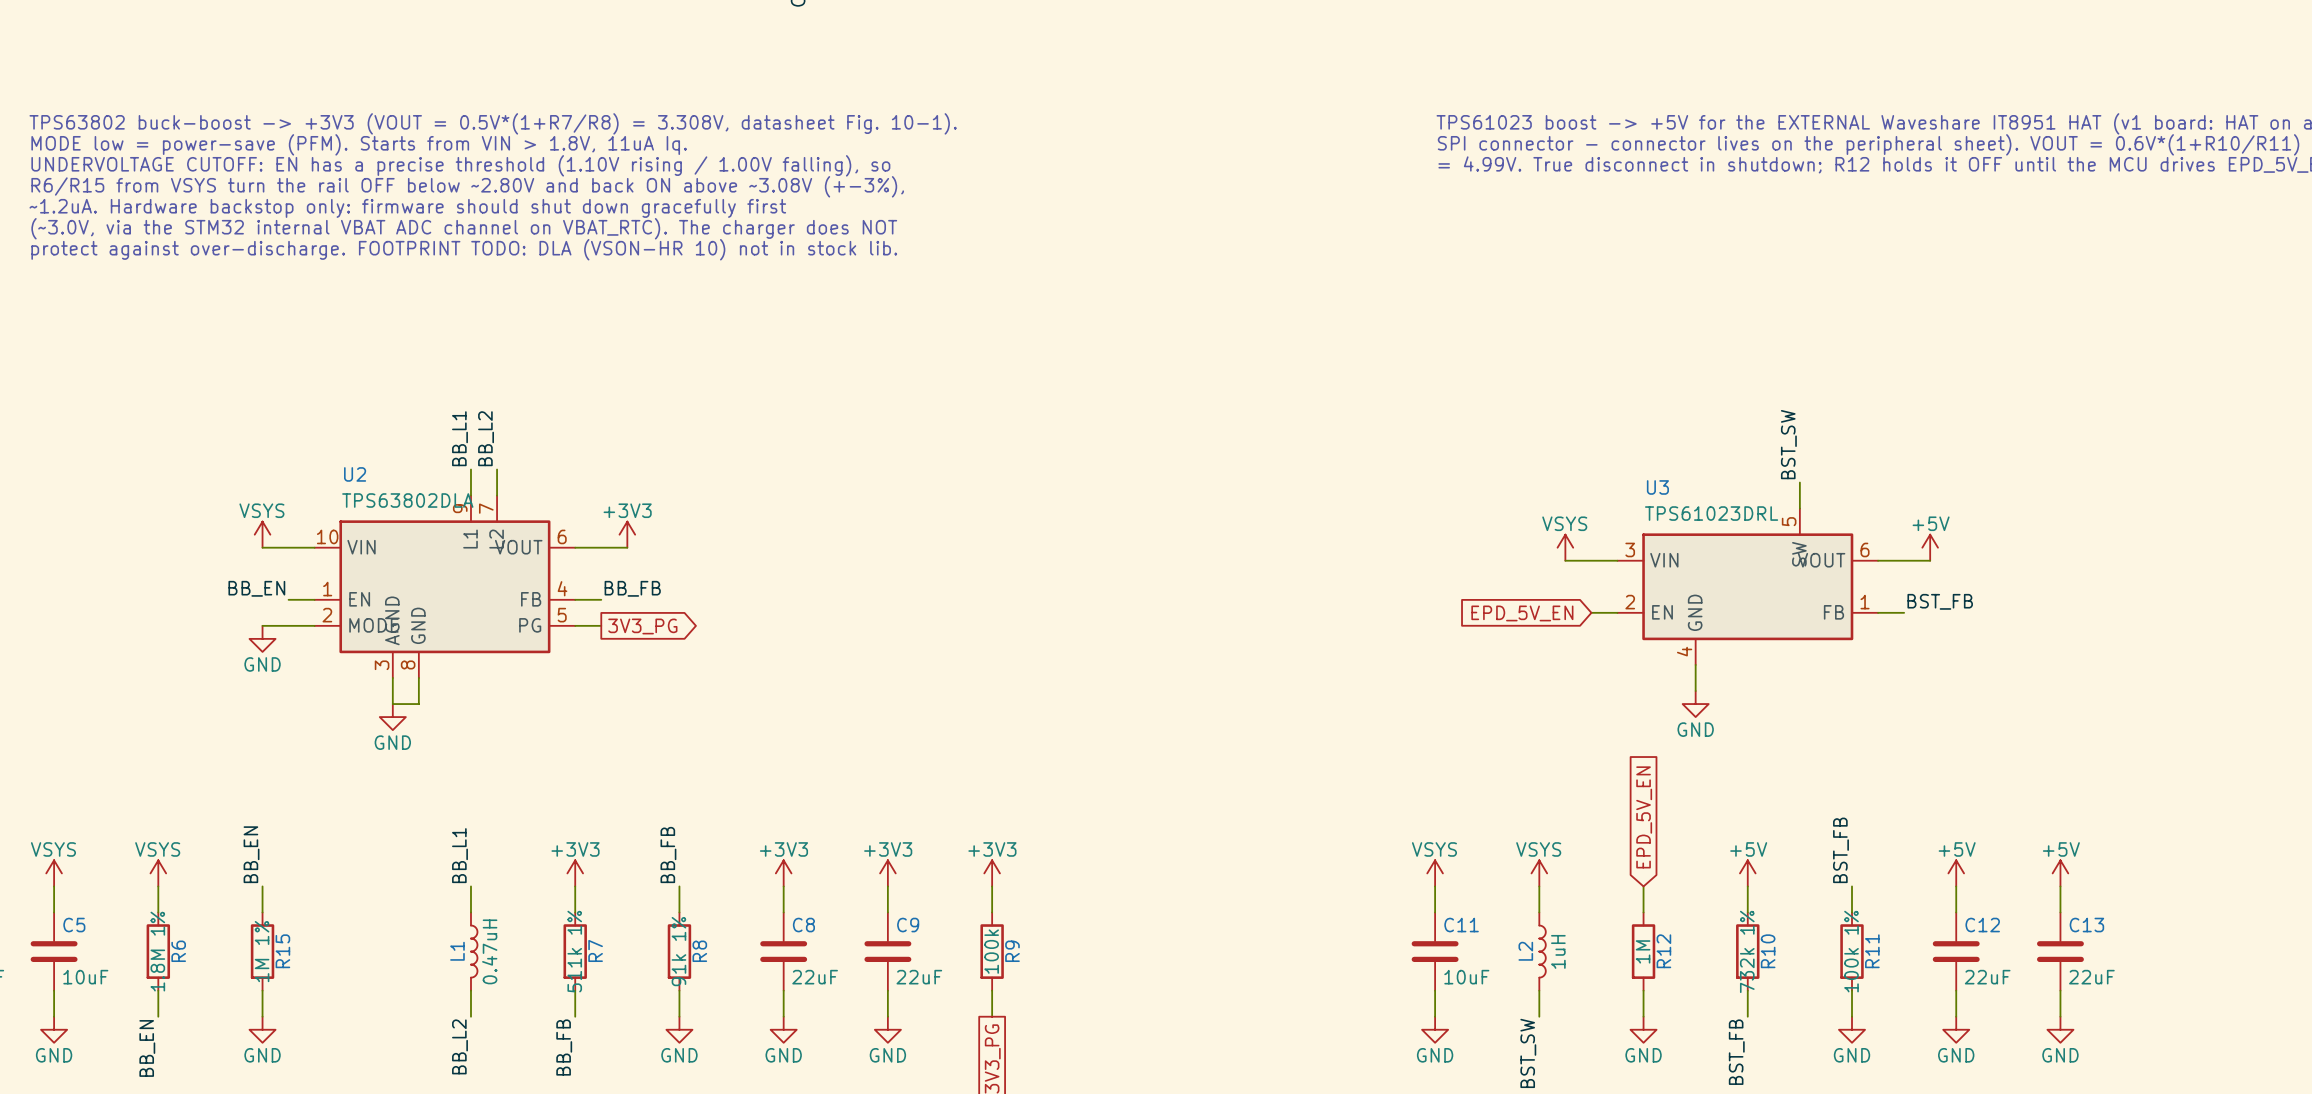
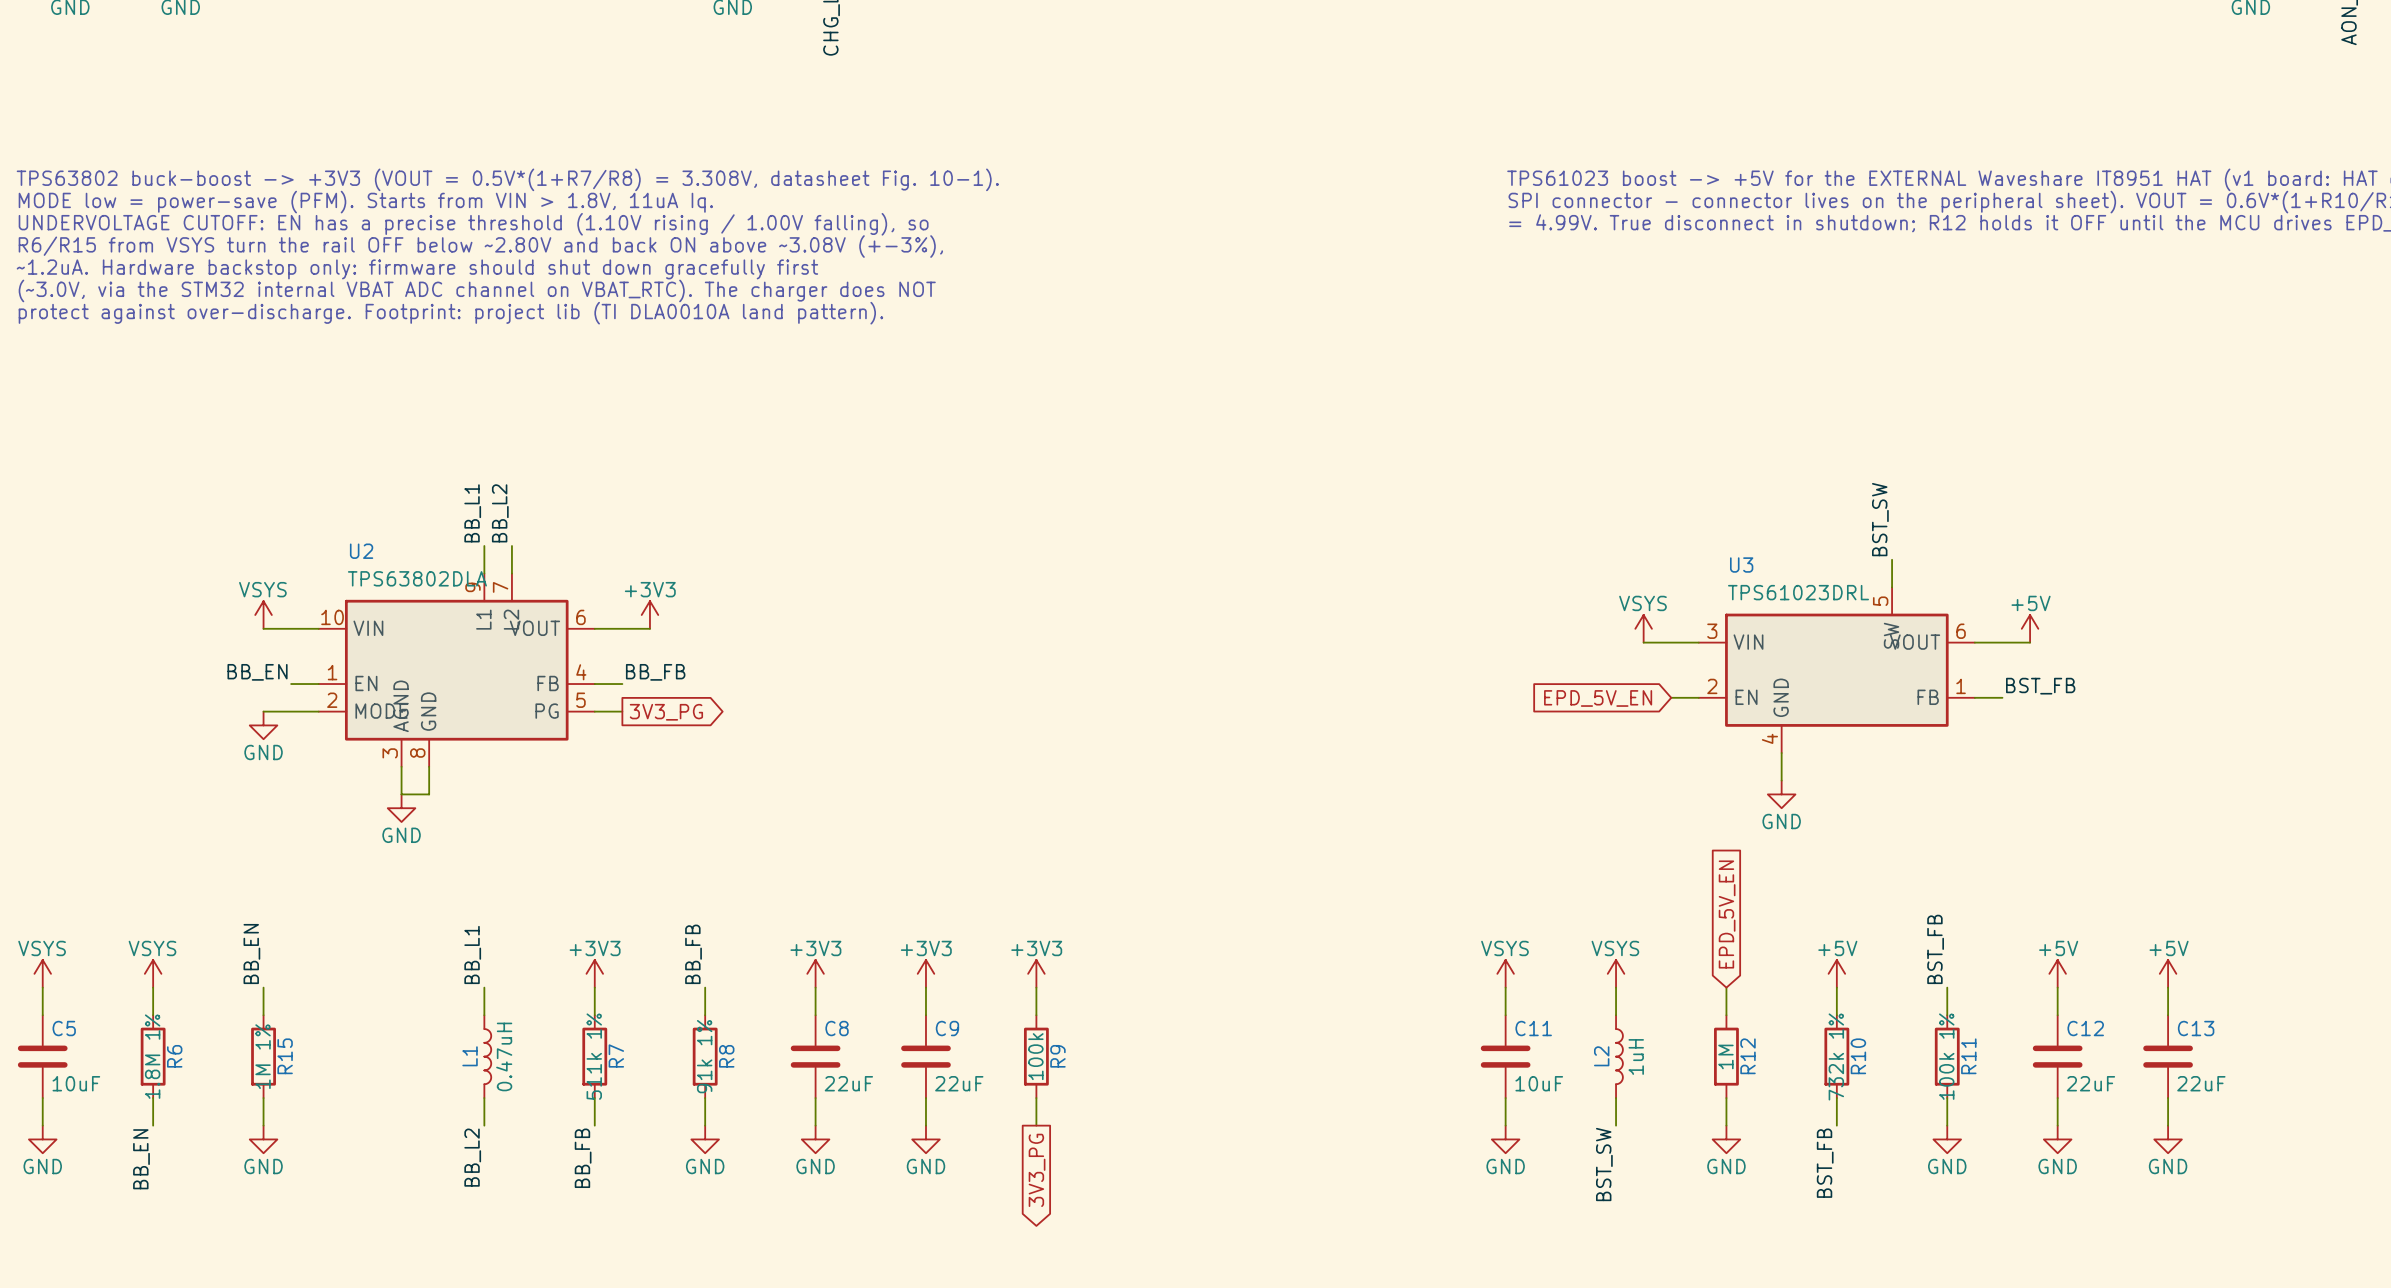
text: protect against over-discharge. FOOTPRINT TODO: DLA (VSON-HR 10) not in stock lib. (464, 249) -> protect against over-discharge. Footprint: project lib (TI DLA0010A land pattern). (450, 313)

